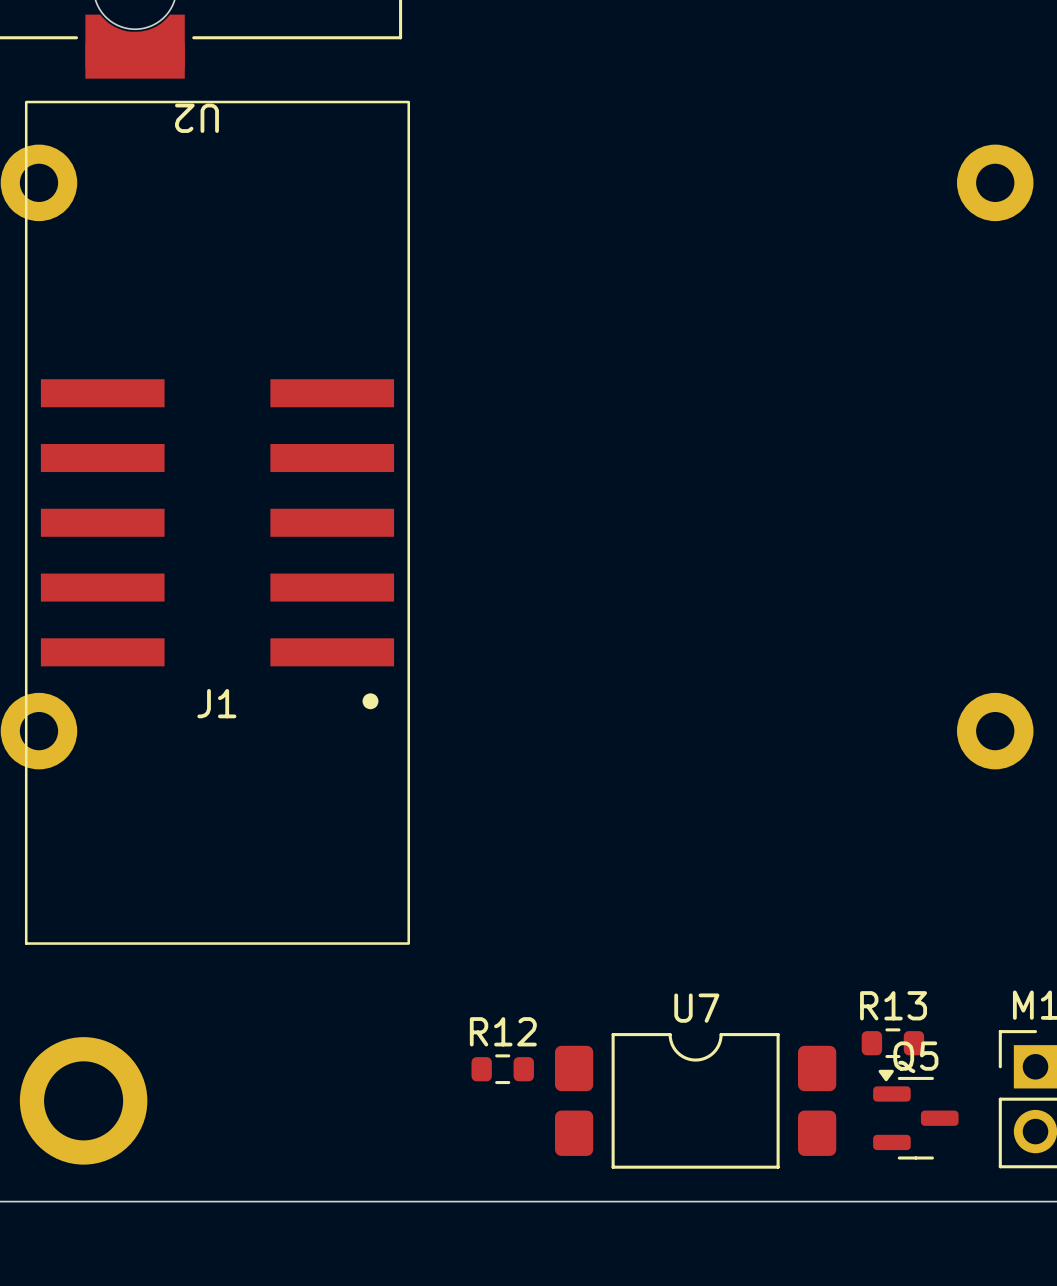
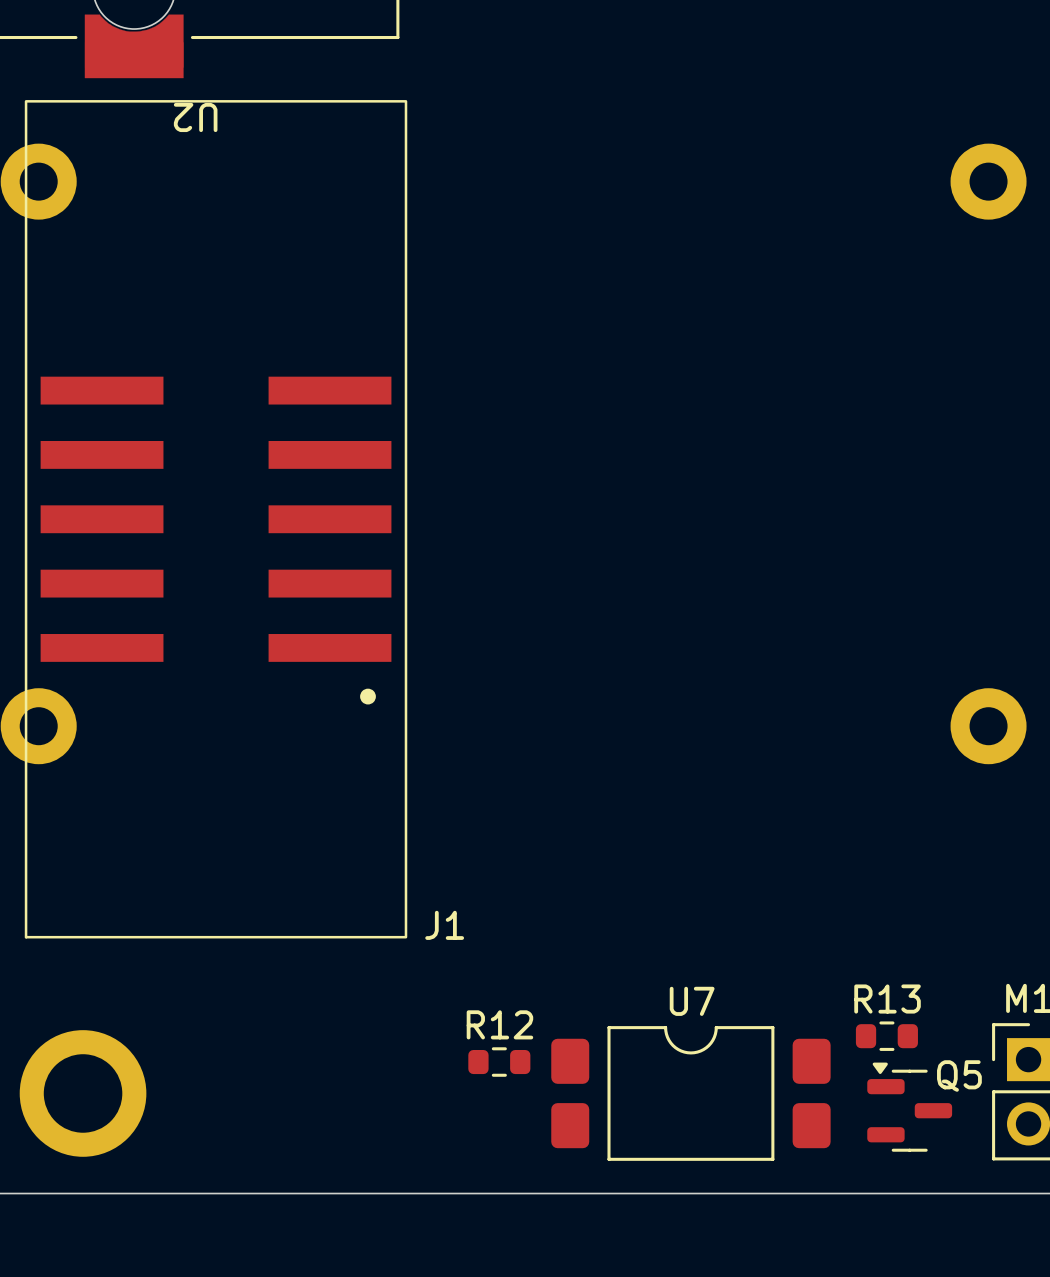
J1 name position: J1 (216, 703) -> J1 (444, 925)
Q5 name position: Q5 (915, 1057) -> Q5 (959, 1076)

